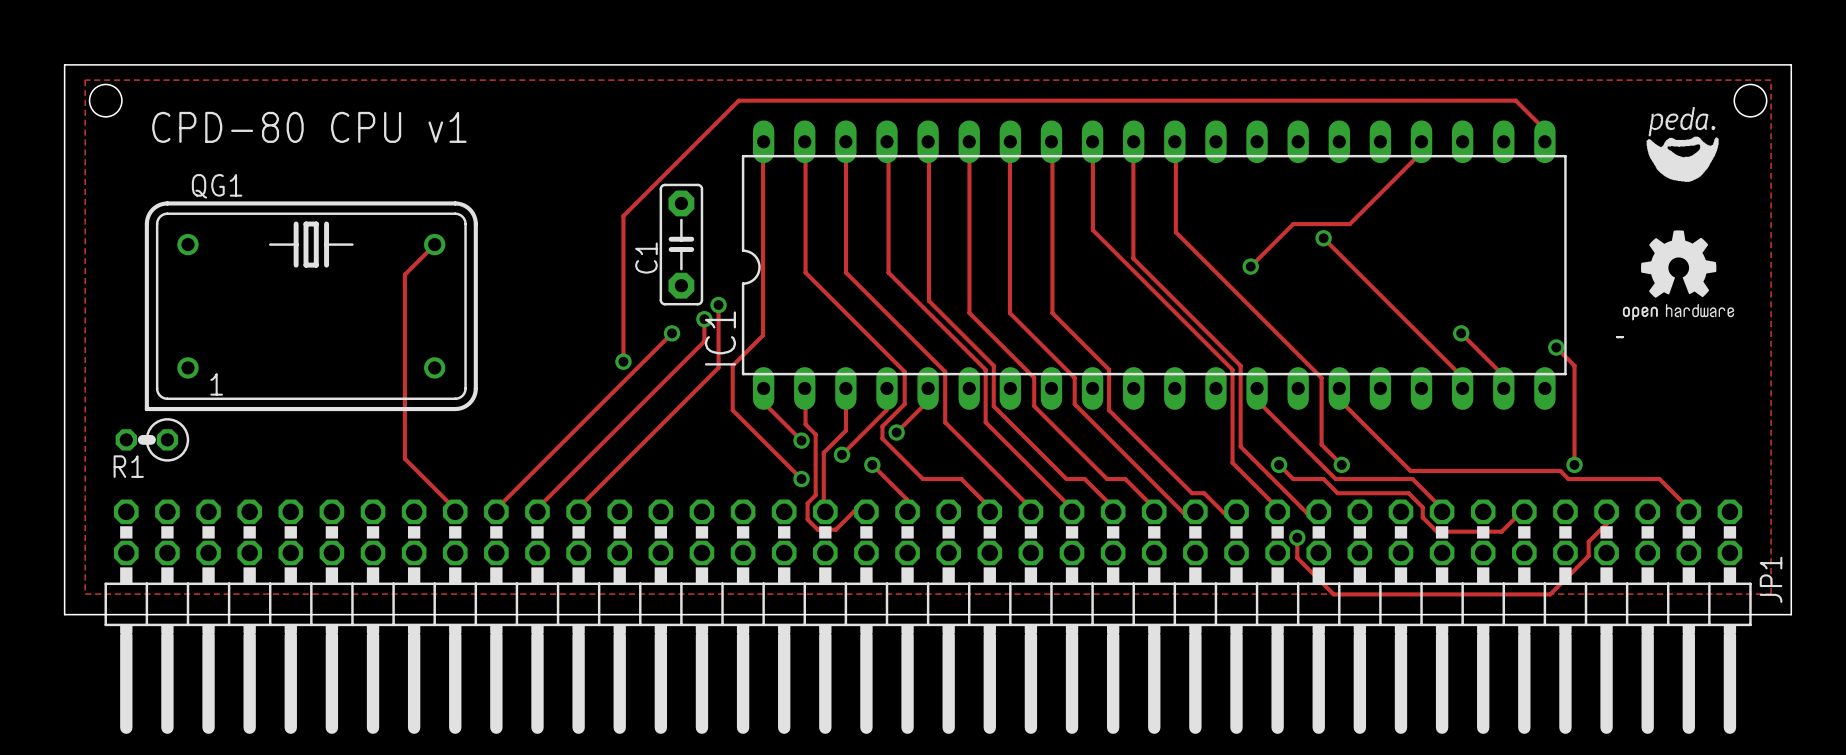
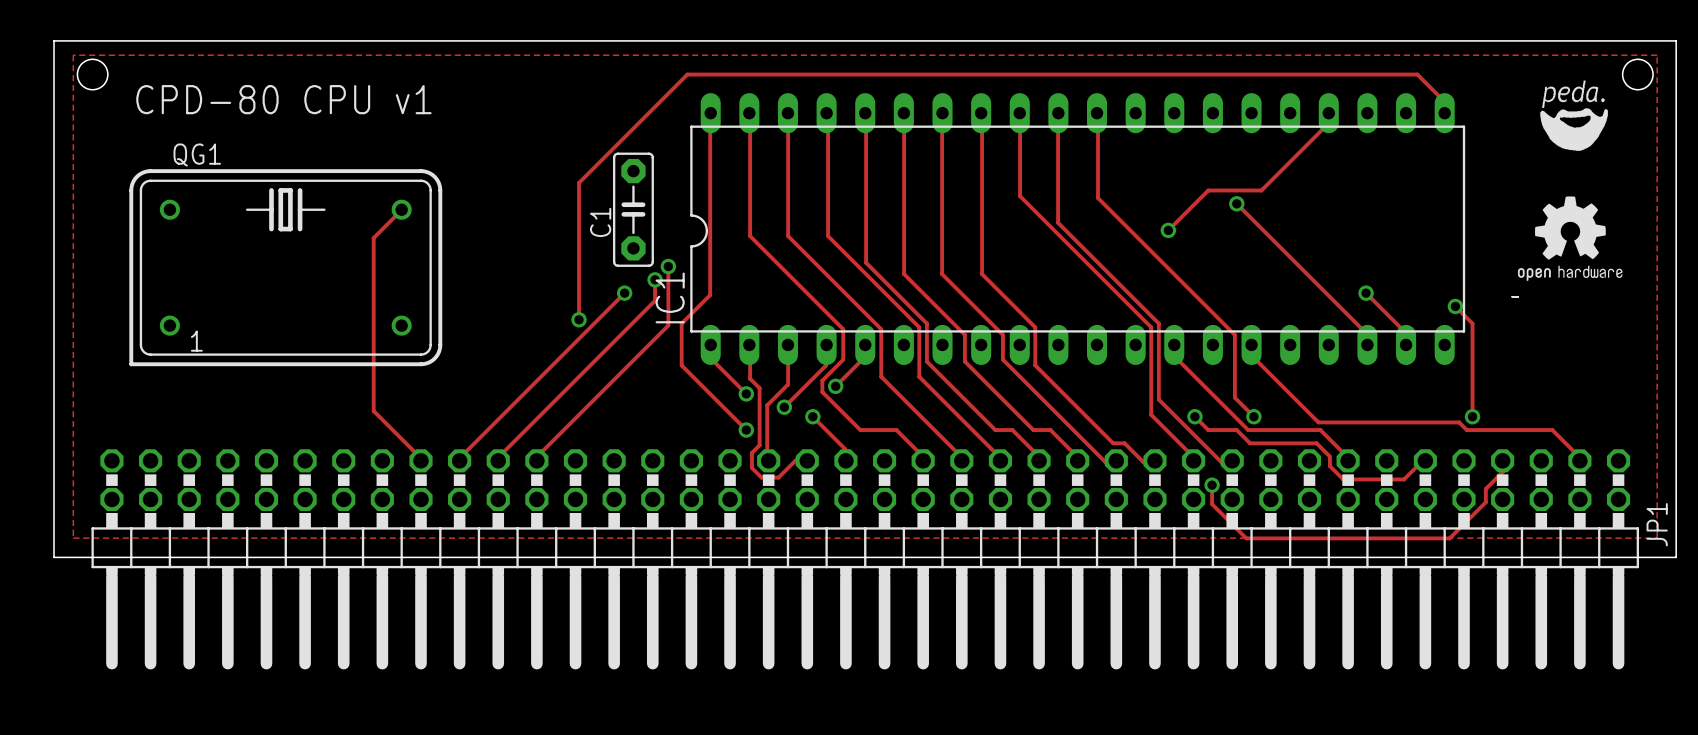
R1: (152, 439) -> none

